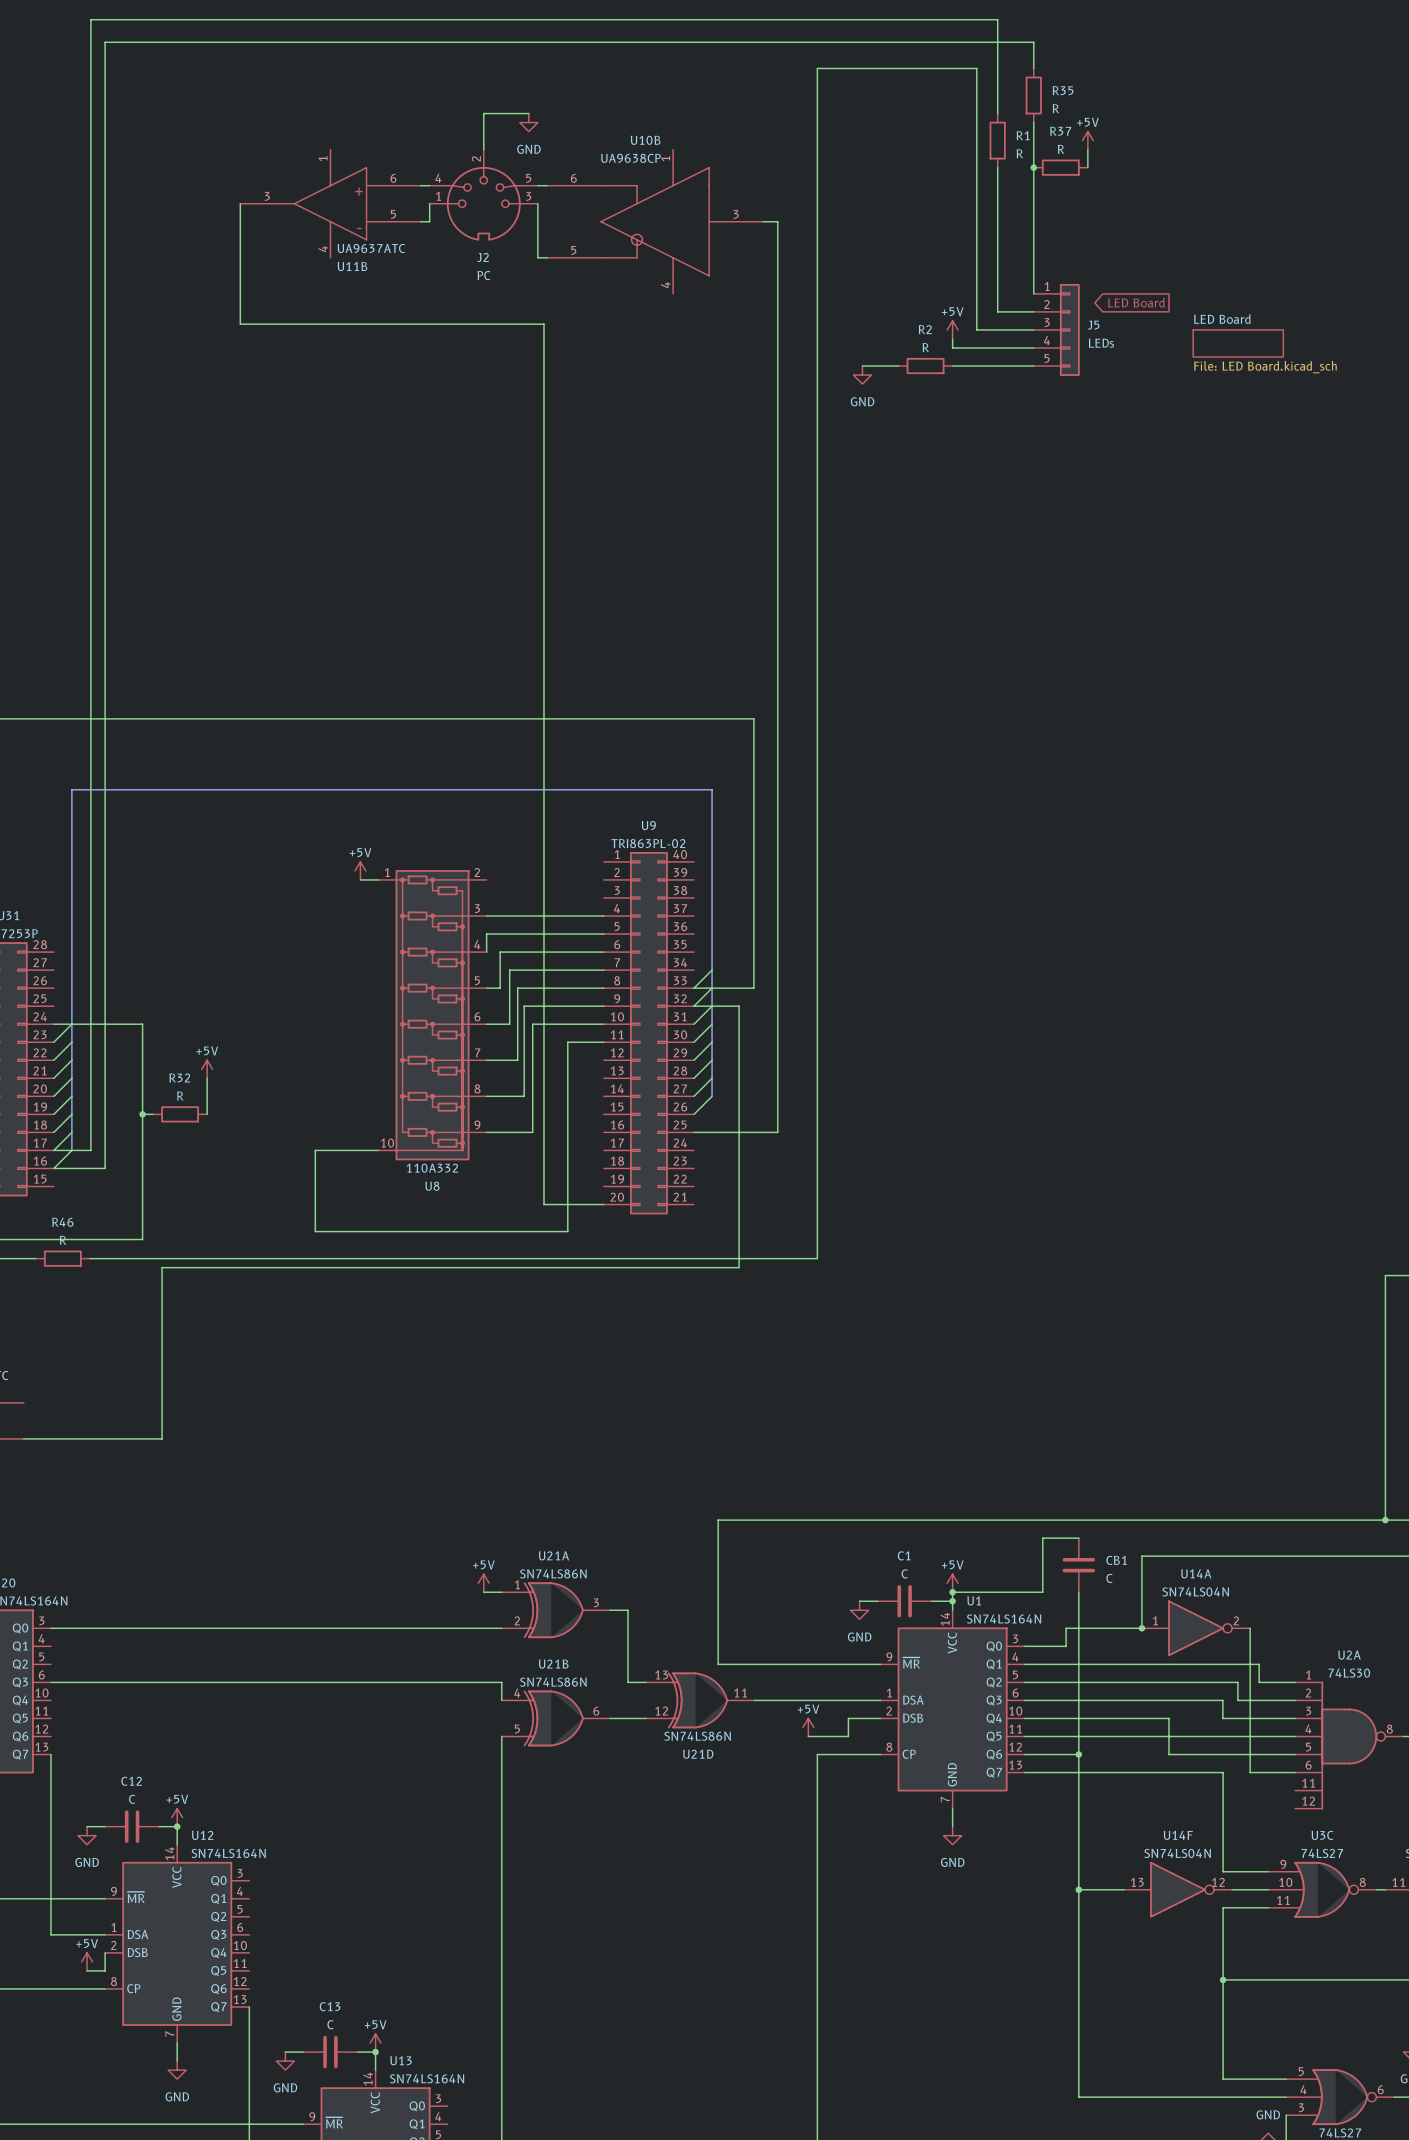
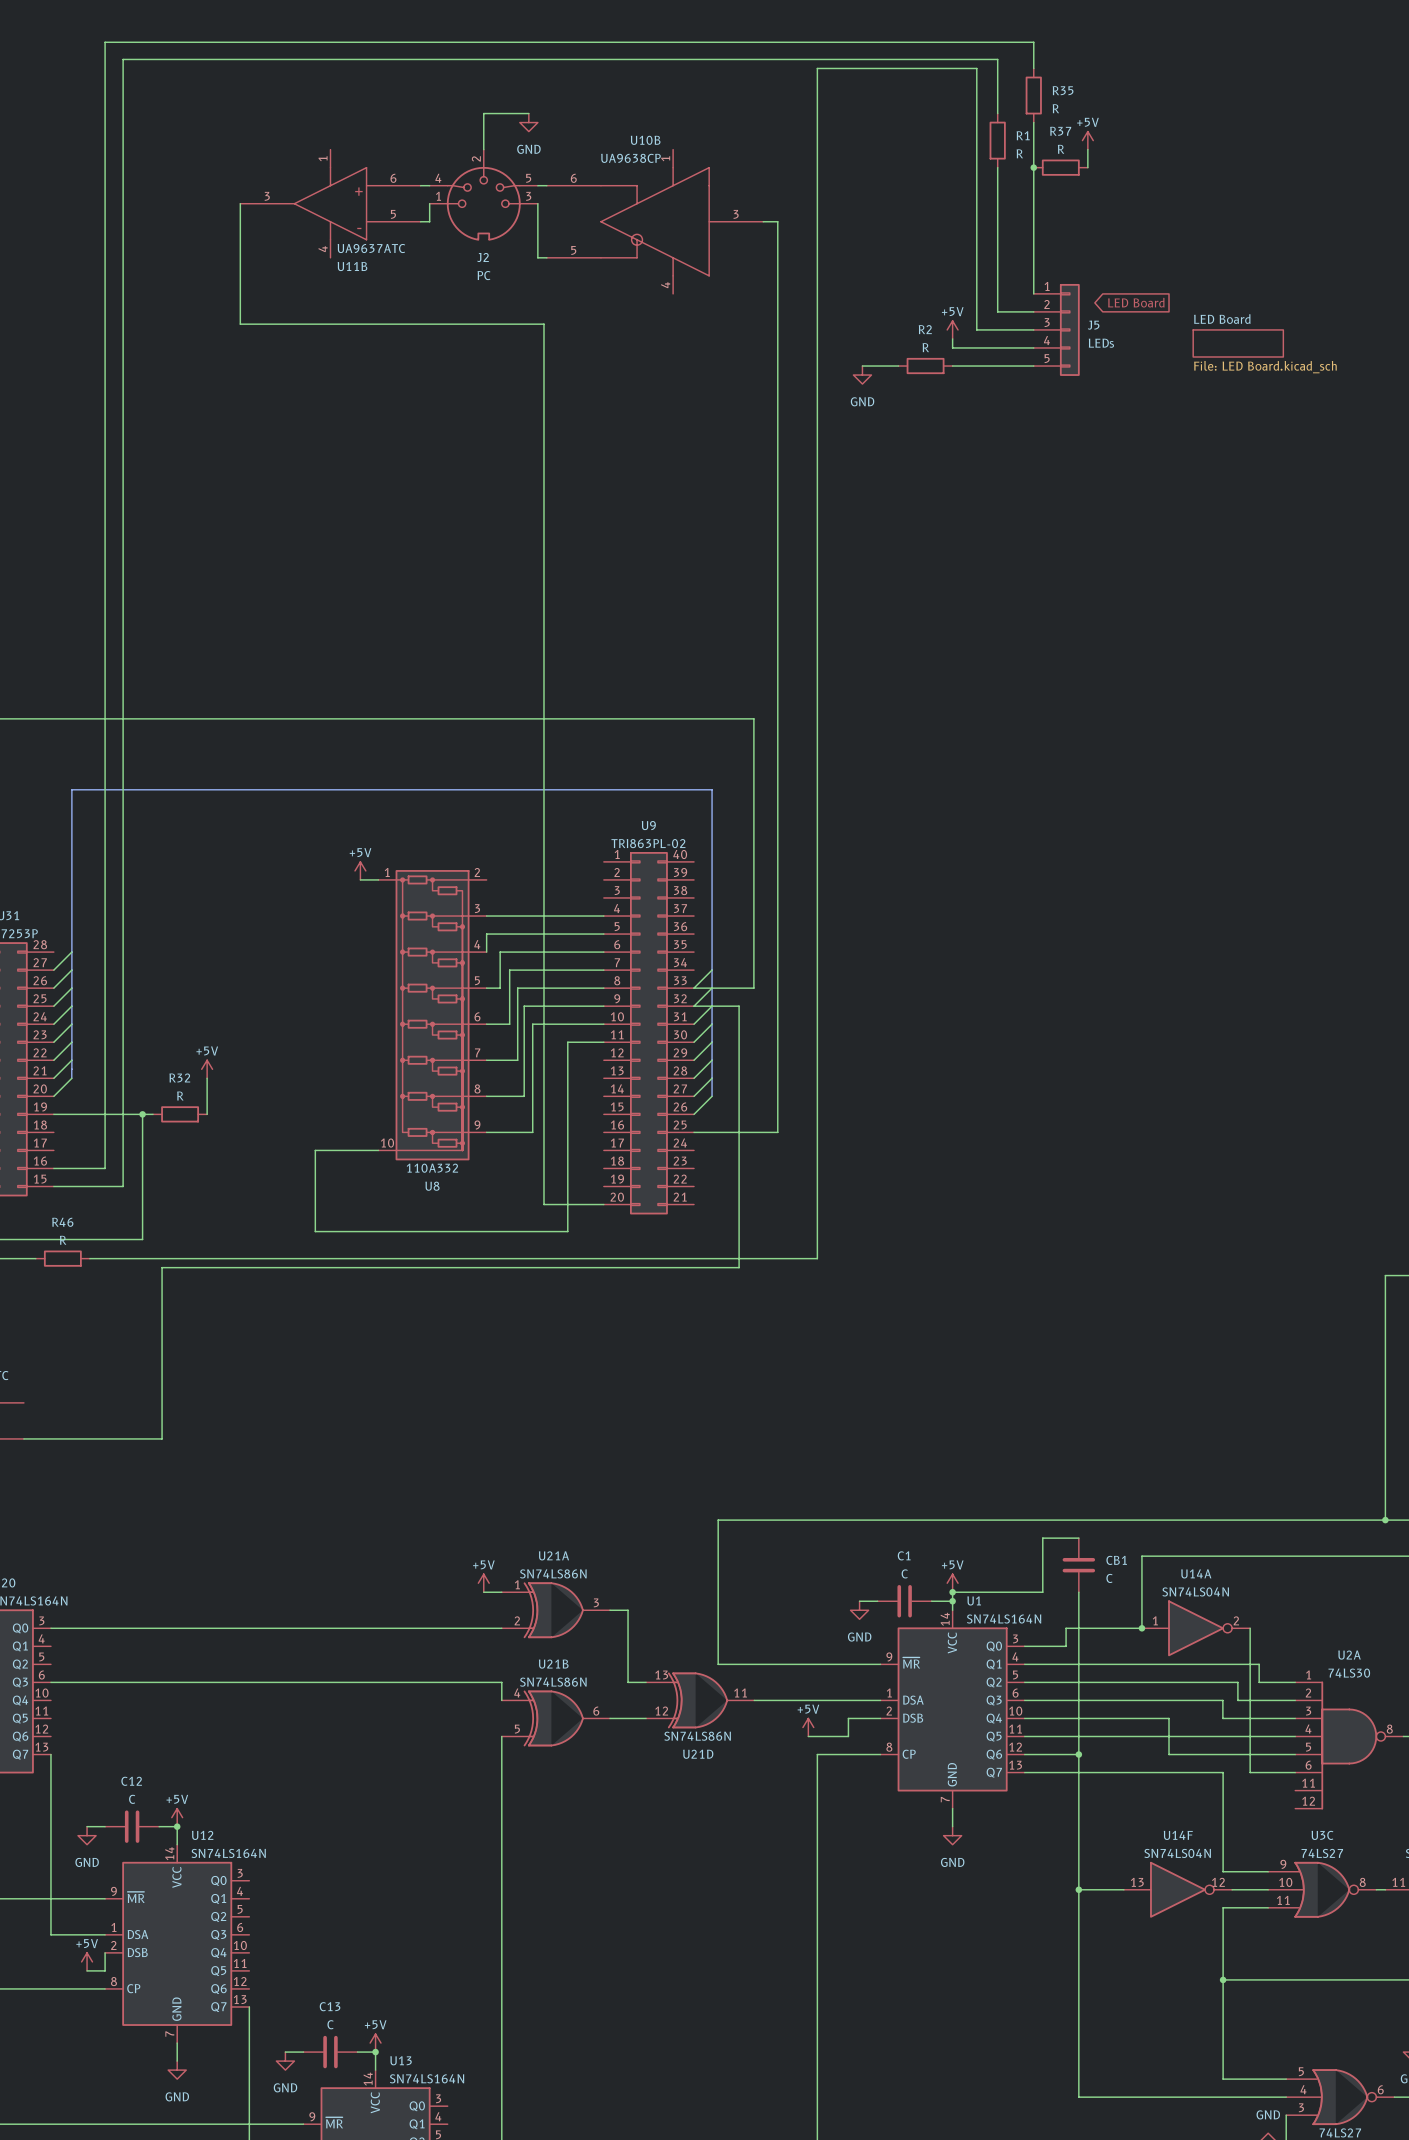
wire: (997, 59) (997, 19) (90, 19) (90, 1150) (53, 1150) (71, 1132) -> (997, 59) (123, 59) (123, 1186) (53, 1186)
wire: none -> (71, 952) (53, 970)
wire: none -> (71, 970) (53, 988)
wire: (53, 1024) (142, 1024) (142, 1114) -> (53, 1024) (71, 1006)
bus: (71, 1069) (71, 1150) -> (71, 1069) (71, 1078)
wire: (71, 1096) (53, 1114) -> (142, 1114) (53, 1114)
wire: (71, 1114) (53, 1132) -> (71, 988) (53, 1006)
wire: (71, 1150) (53, 1168) -> none

